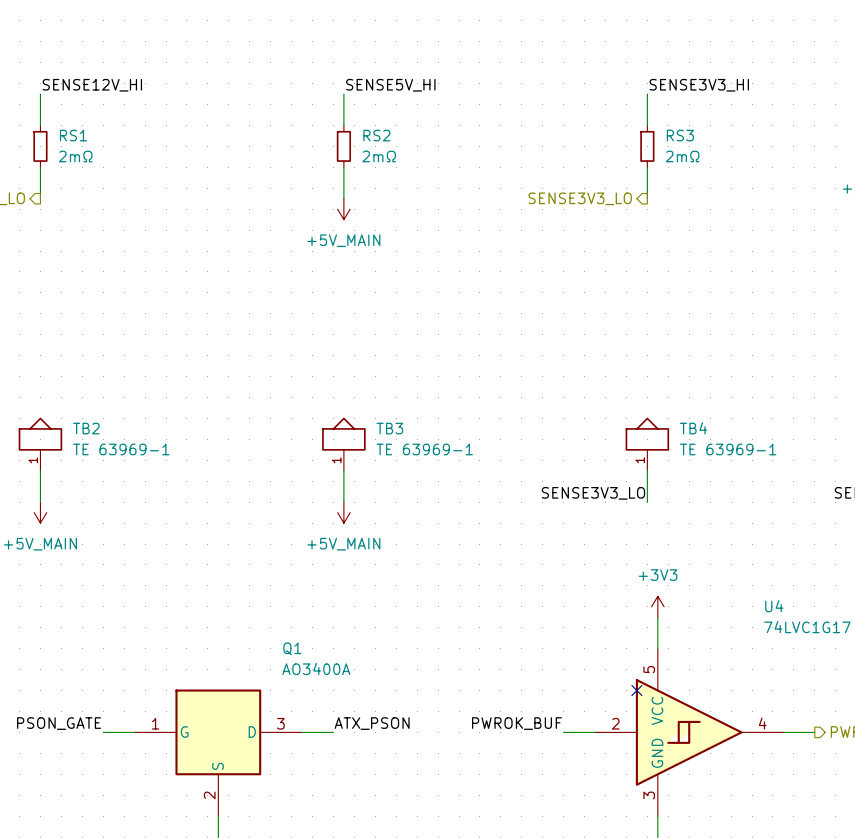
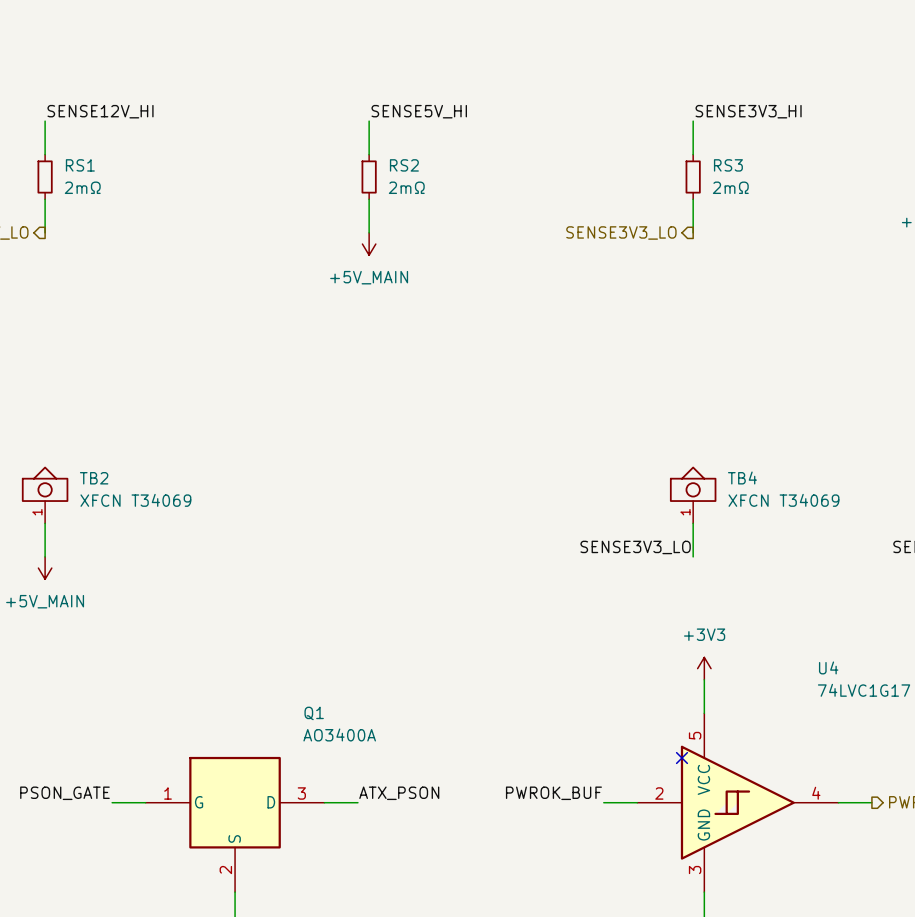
TB2 symbol: [18, 417, 63, 471] -> [21, 466, 69, 524]
TB4 symbol: [625, 417, 670, 471] -> [669, 466, 717, 524]
TB3: TE 63969-1 (343, 444) -> none
TB2 value: TE 63969-1 (121, 449) -> XFCN T34069 (135, 500)
TB4 value: TE 63969-1 (728, 449) -> XFCN T34069 (783, 500)
wire: (343, 470) (343, 502) -> none
power symbol: +5V_MAIN (343, 512) -> none

